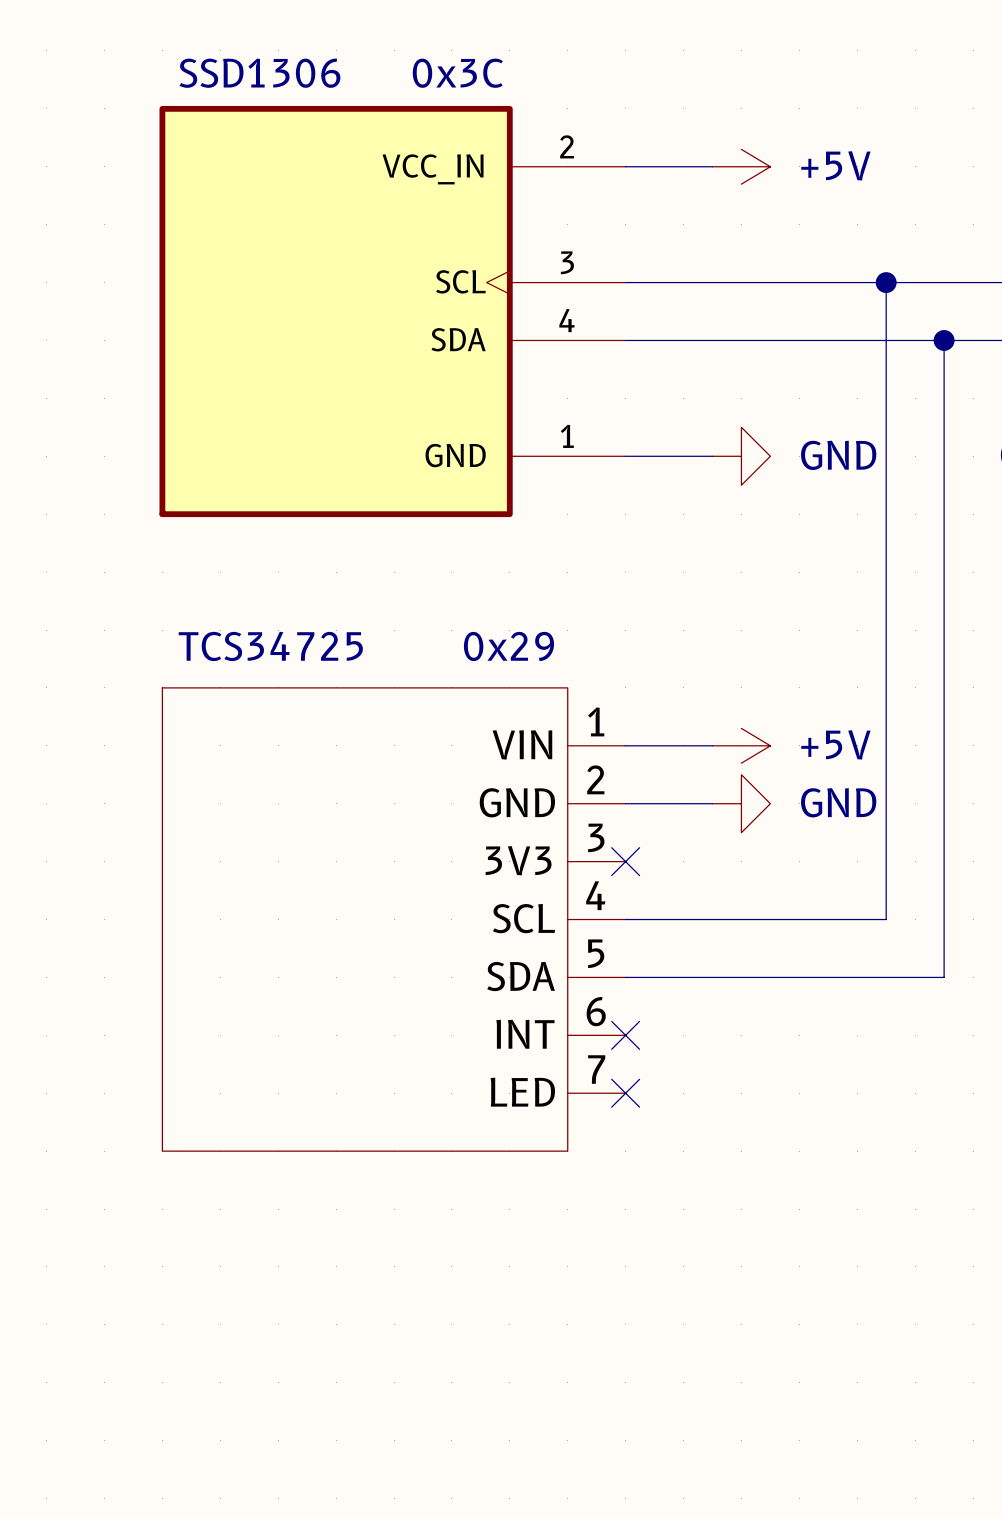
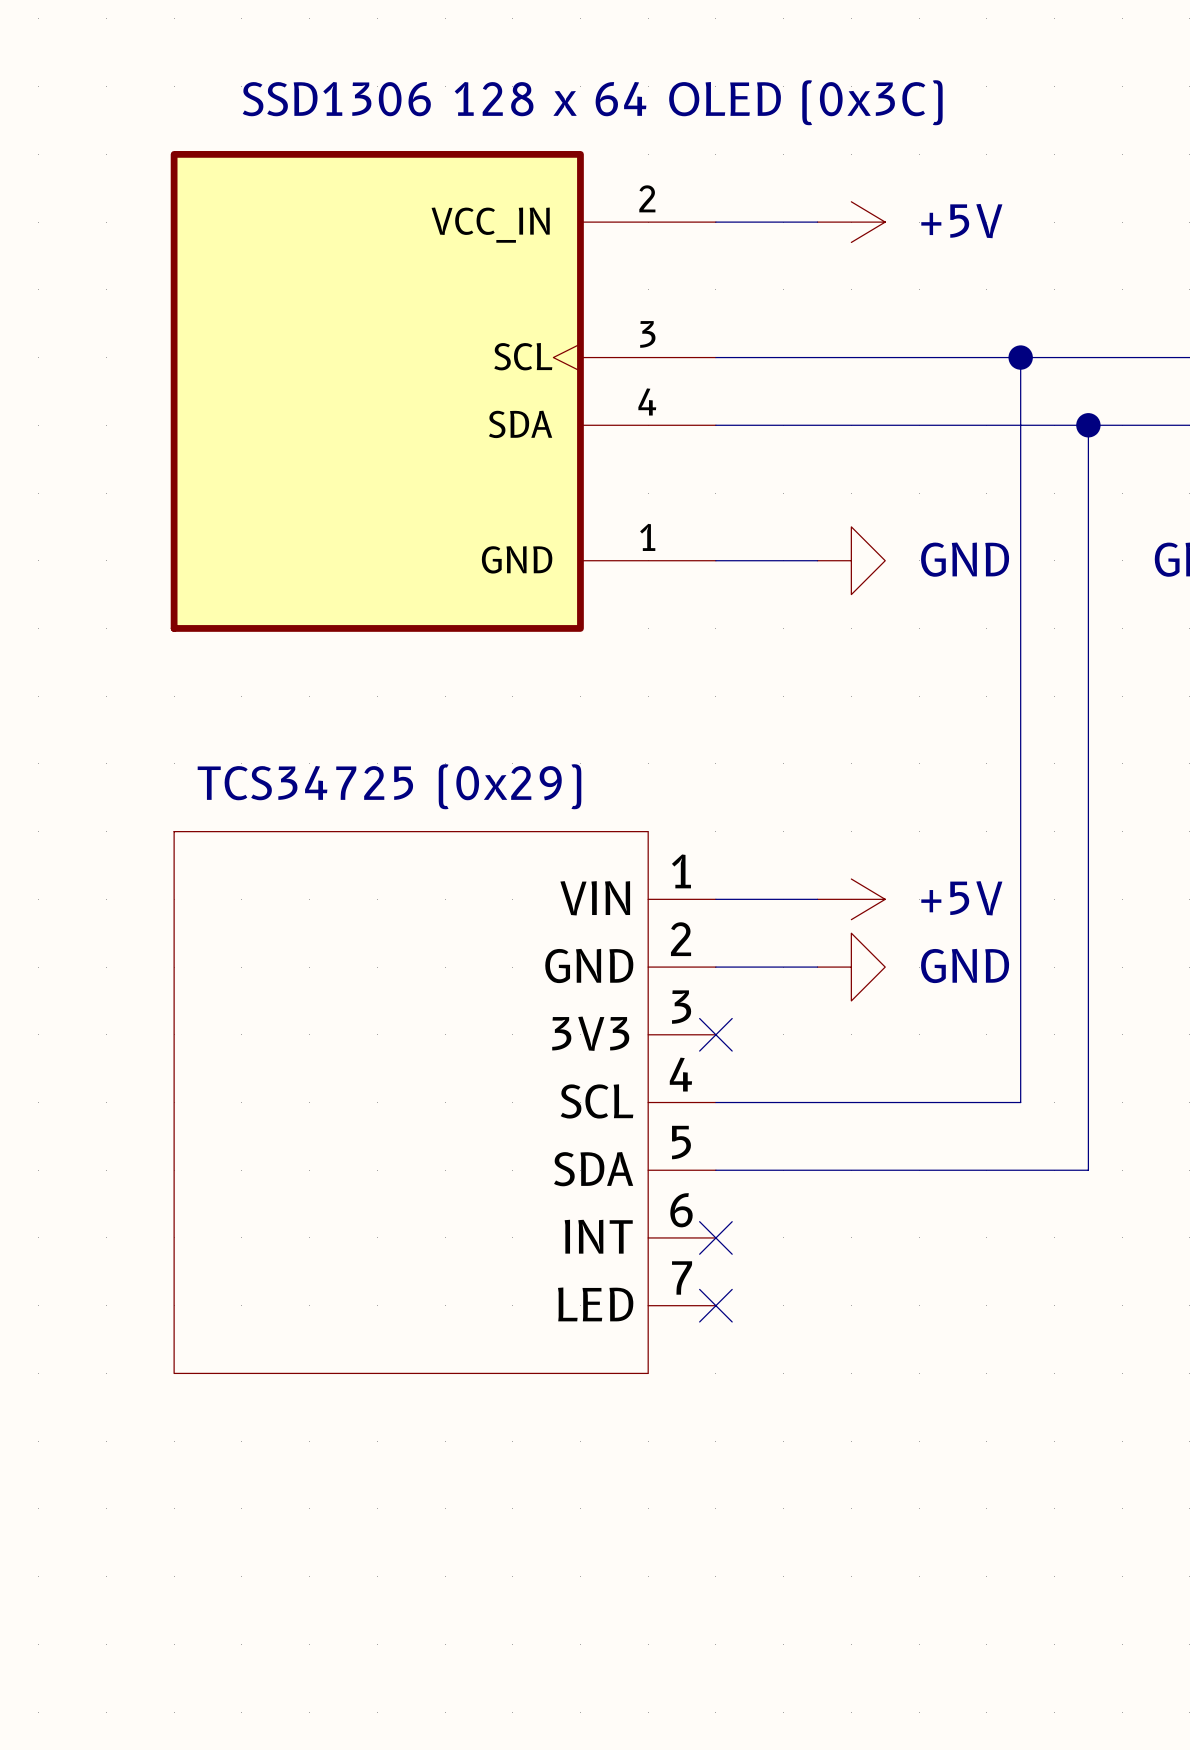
part value: SSD1306 (259, 73) -> SSD1306 128 x 64 OLED (0x3C) (592, 102)
part text: 0x3C (457, 73) -> none
part value: TCS34725 (270, 646) -> TCS34725 (0x29) (389, 786)
part text: 0x29 (508, 646) -> none

